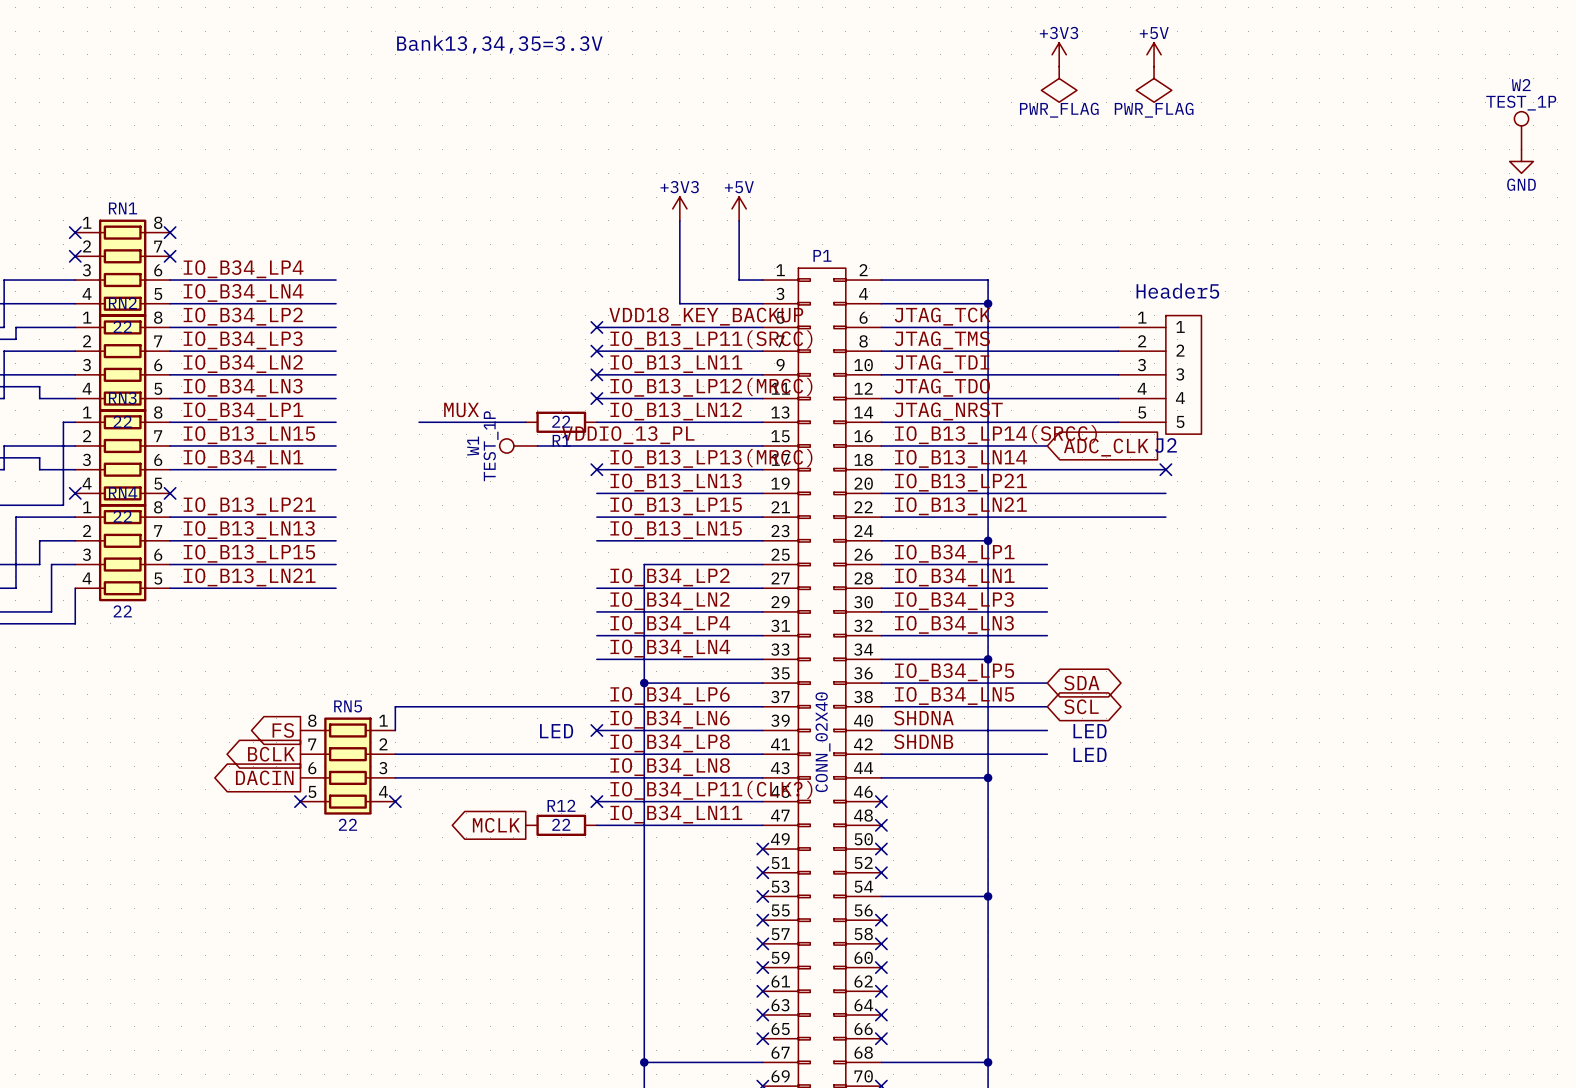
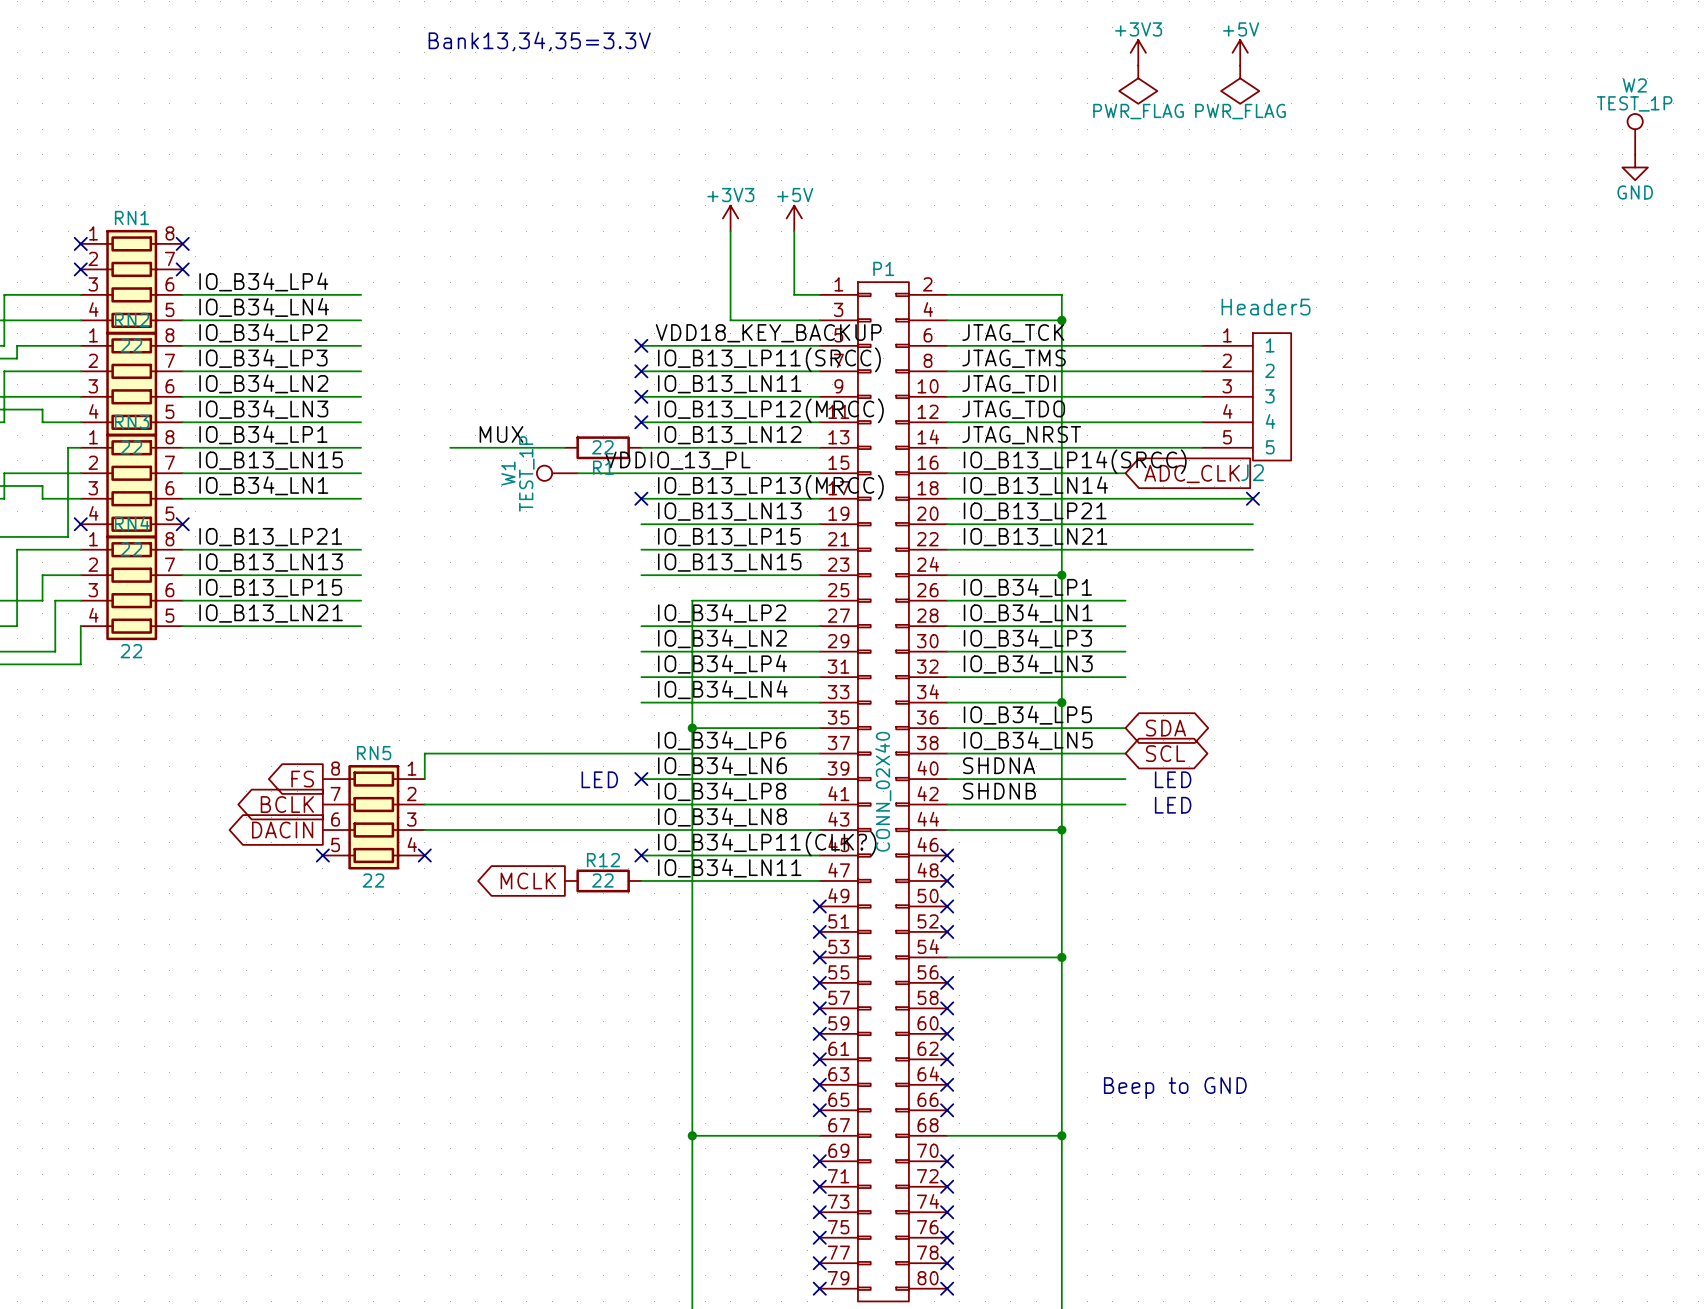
text: none -> Beep to GND (1175, 1088)

